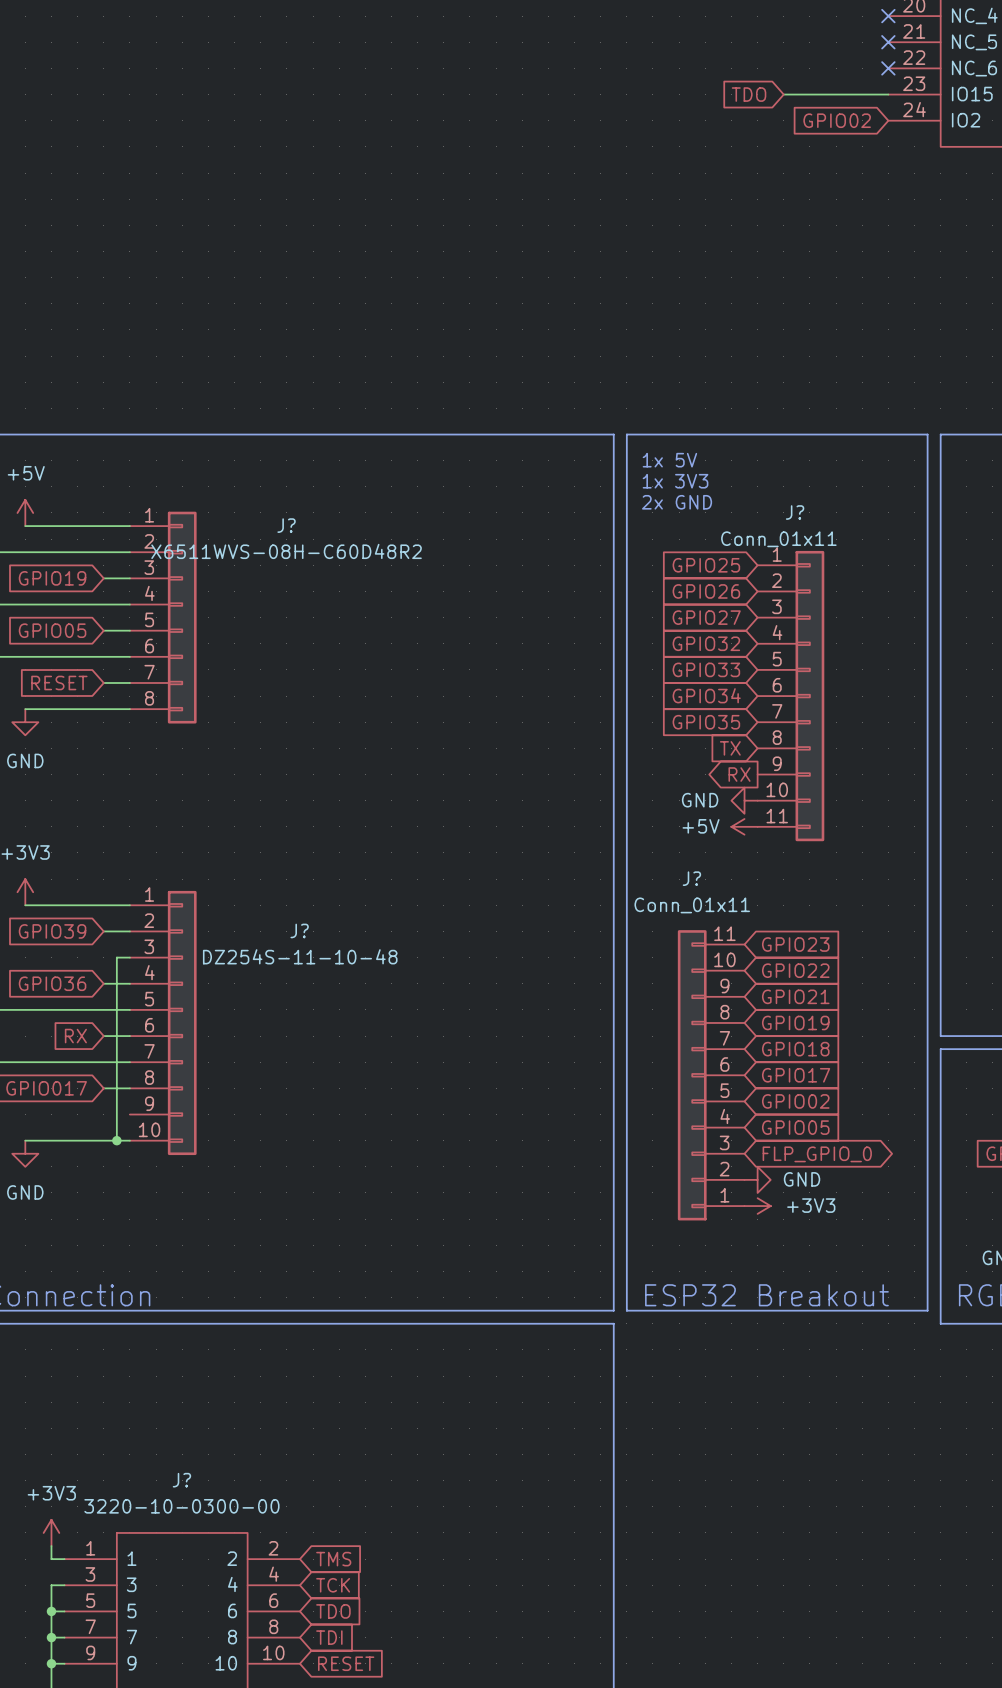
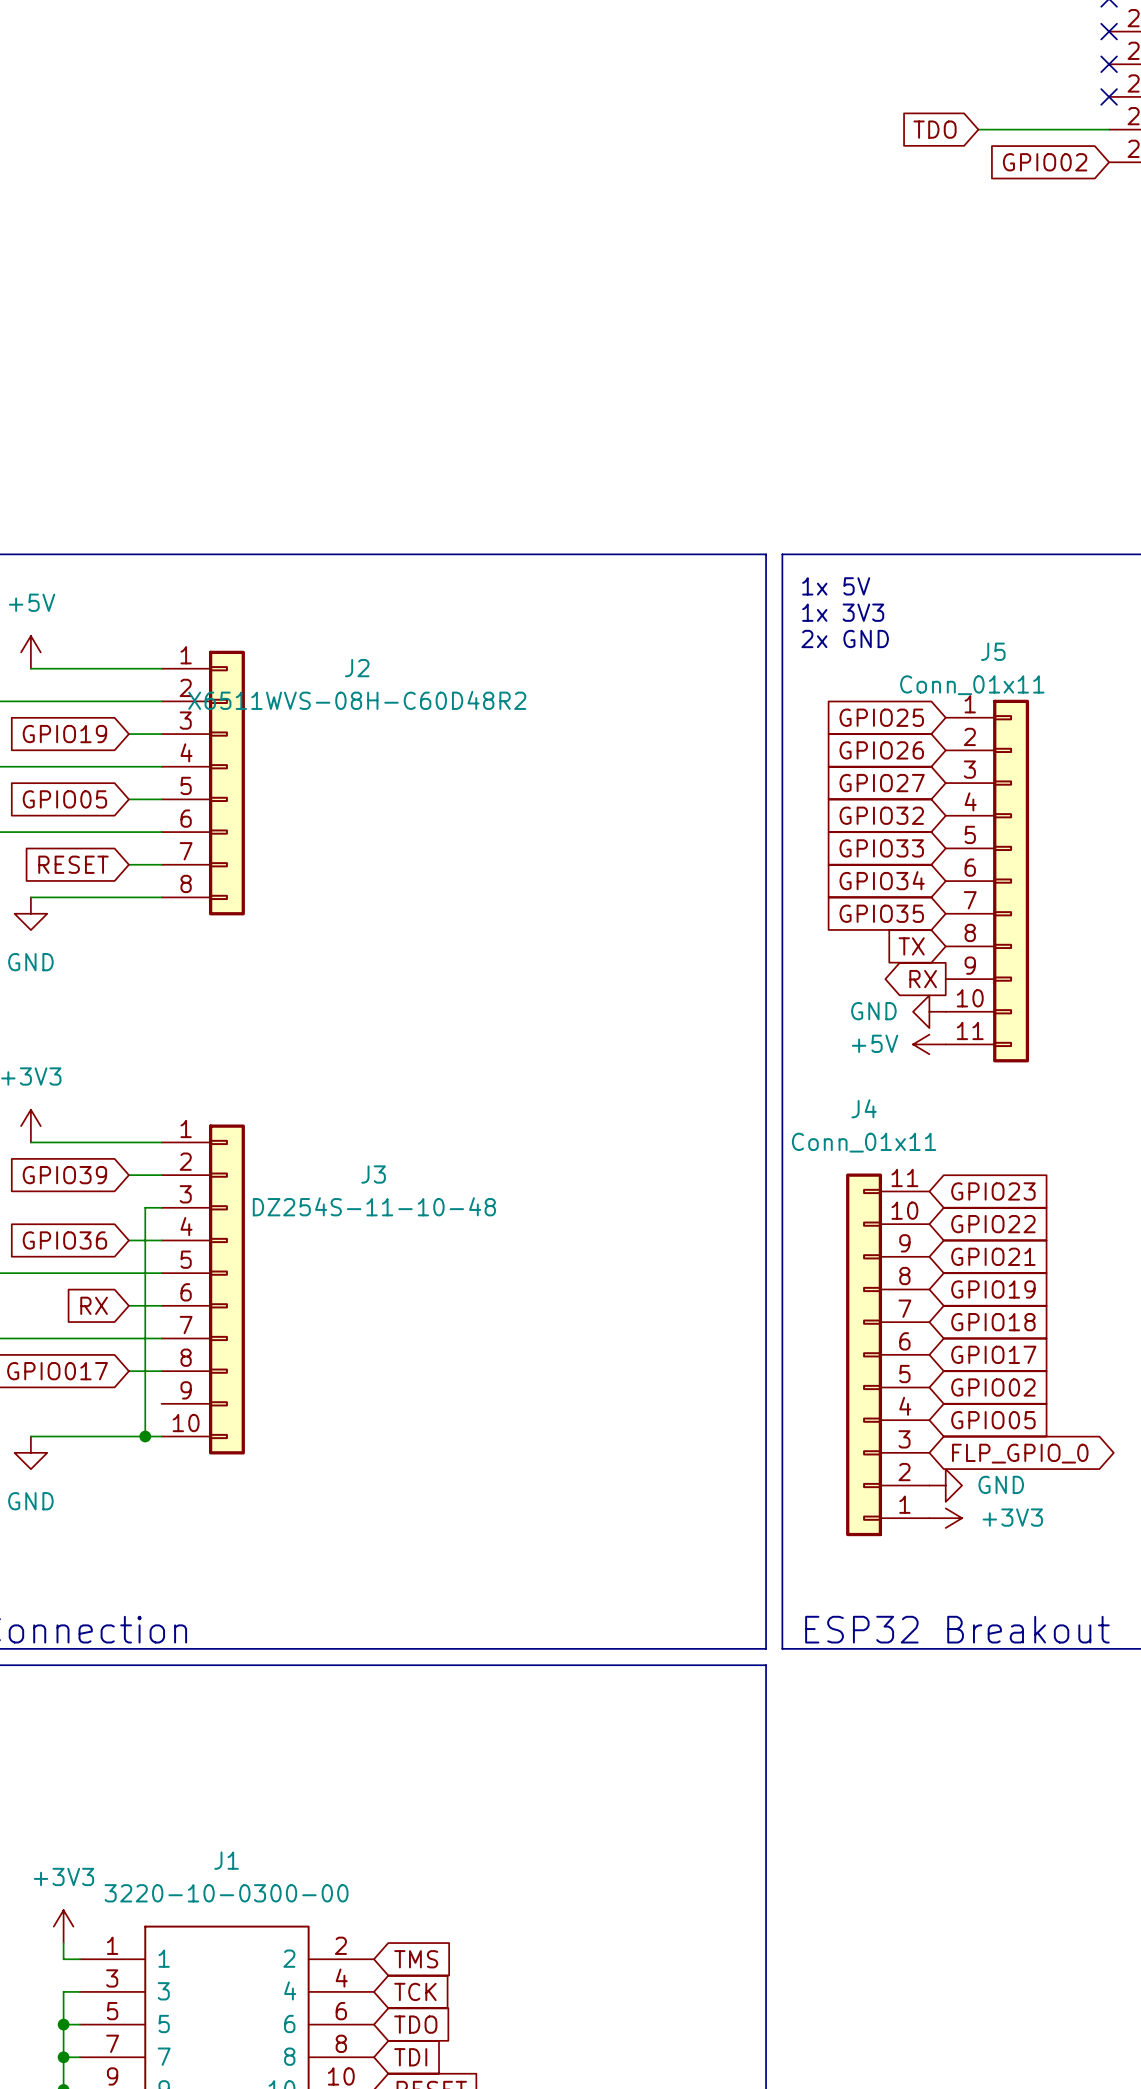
J? name: J? (795, 512) -> J5 (993, 651)
J? name: J? (286, 525) -> J2 (357, 668)
J? name: J? (691, 878) -> J4 (864, 1108)
J? name: J? (299, 930) -> J3 (373, 1174)
J? name: J? (181, 1480) -> J1 (226, 1860)

